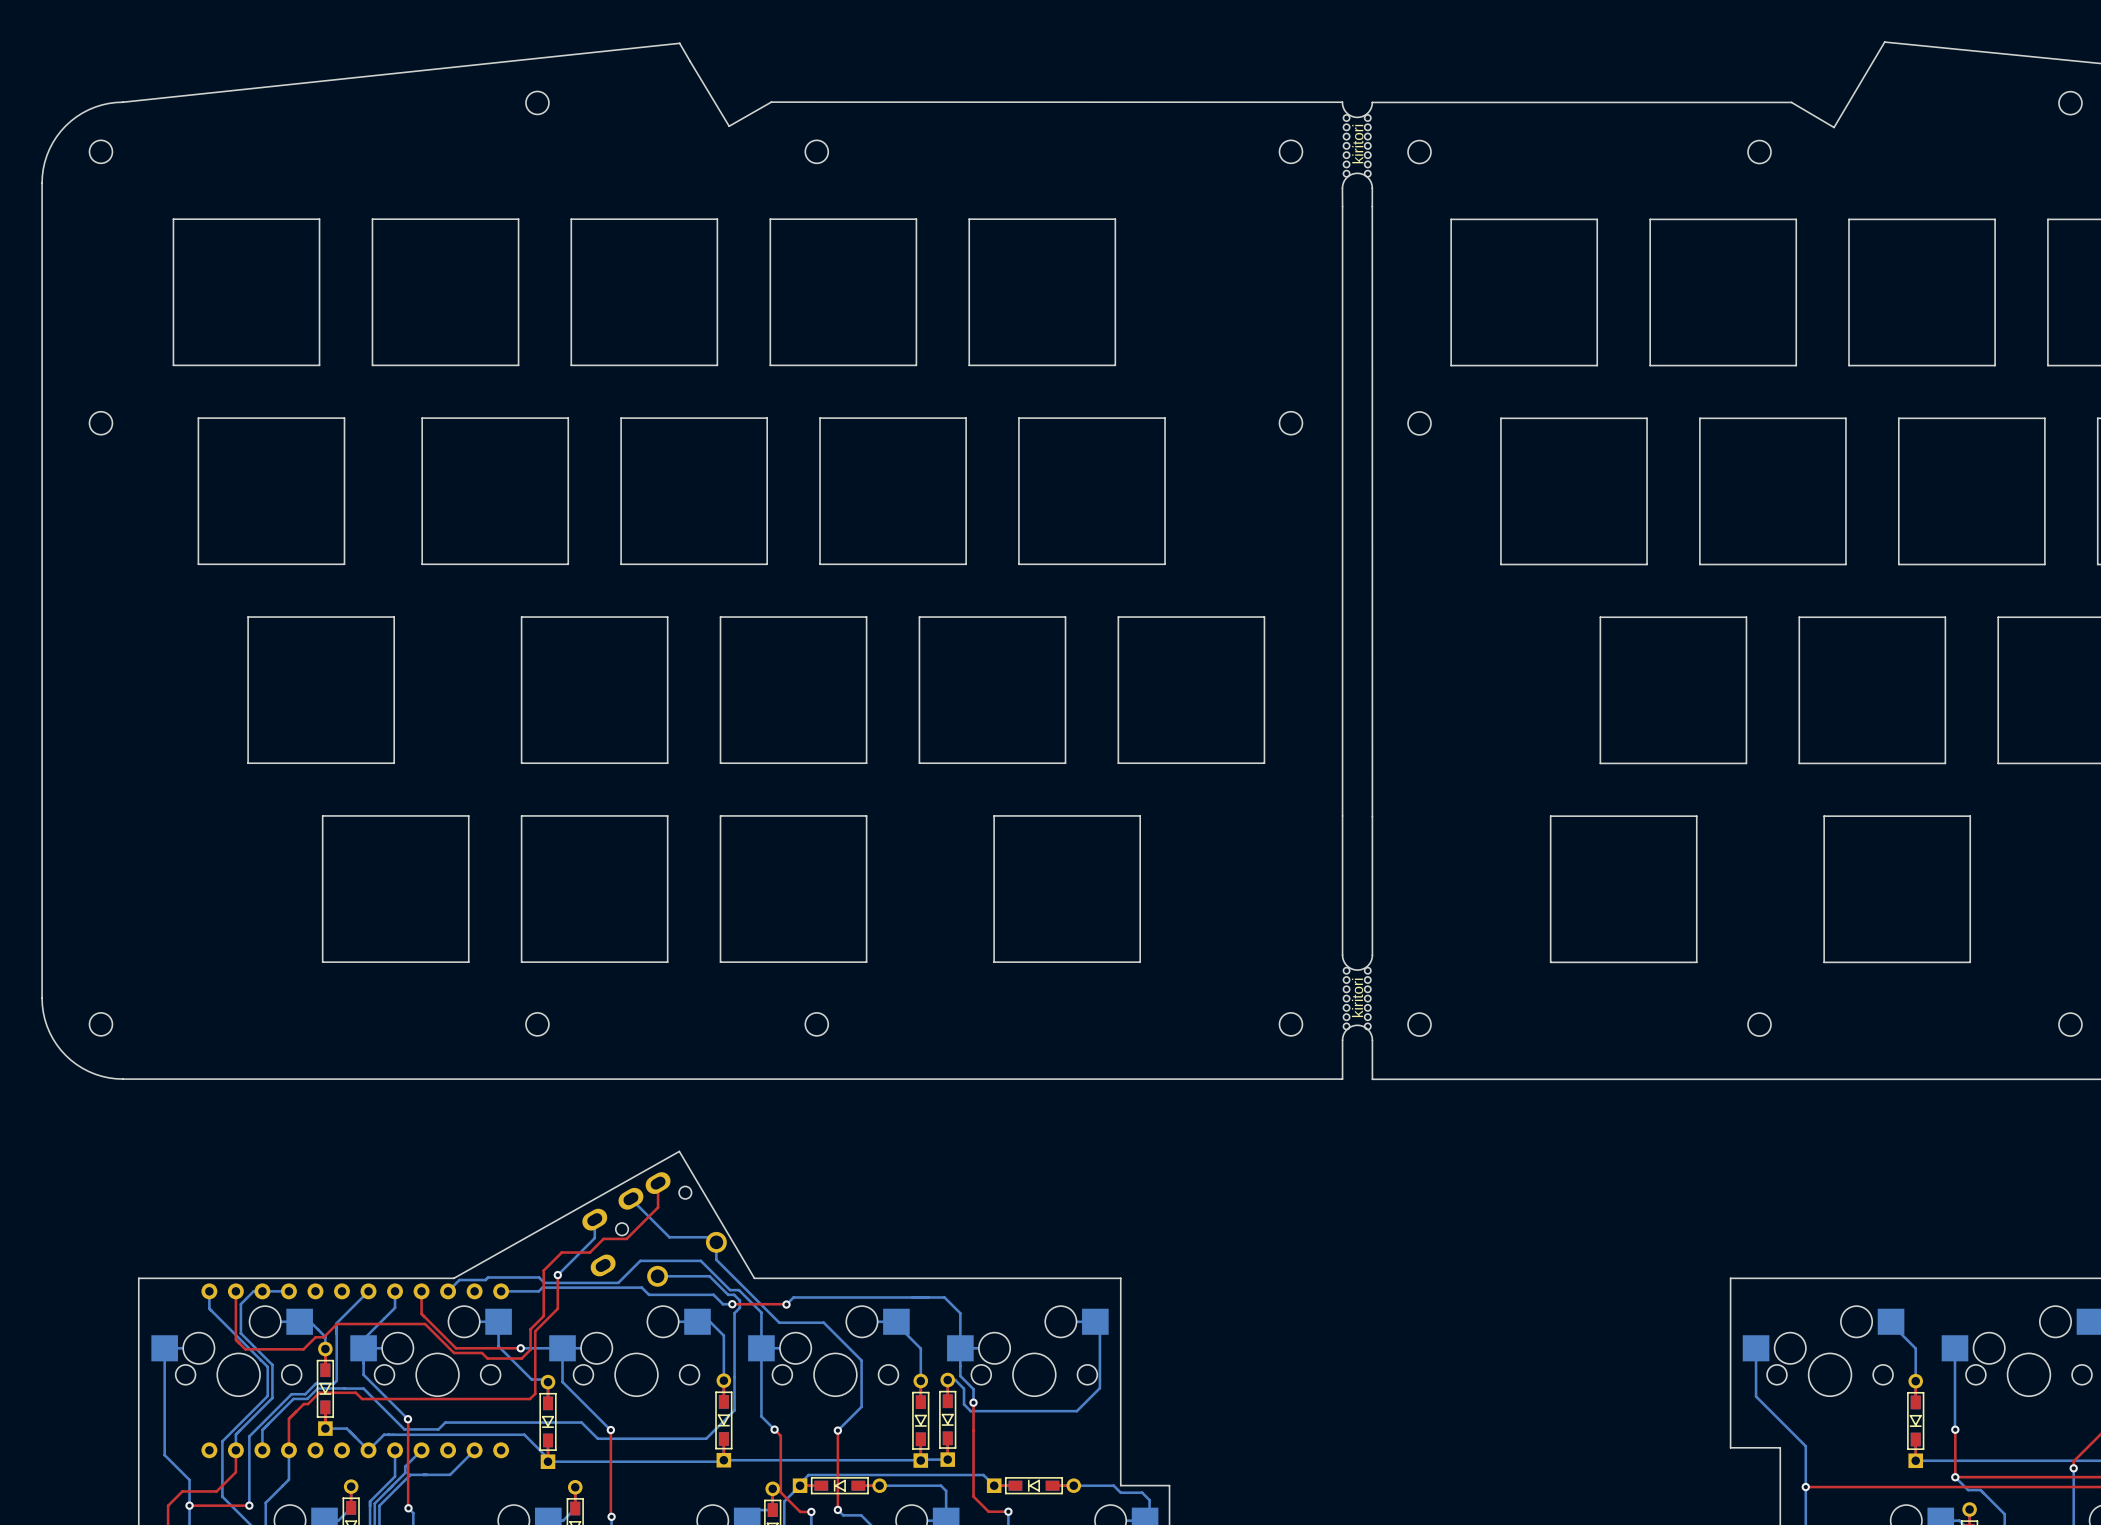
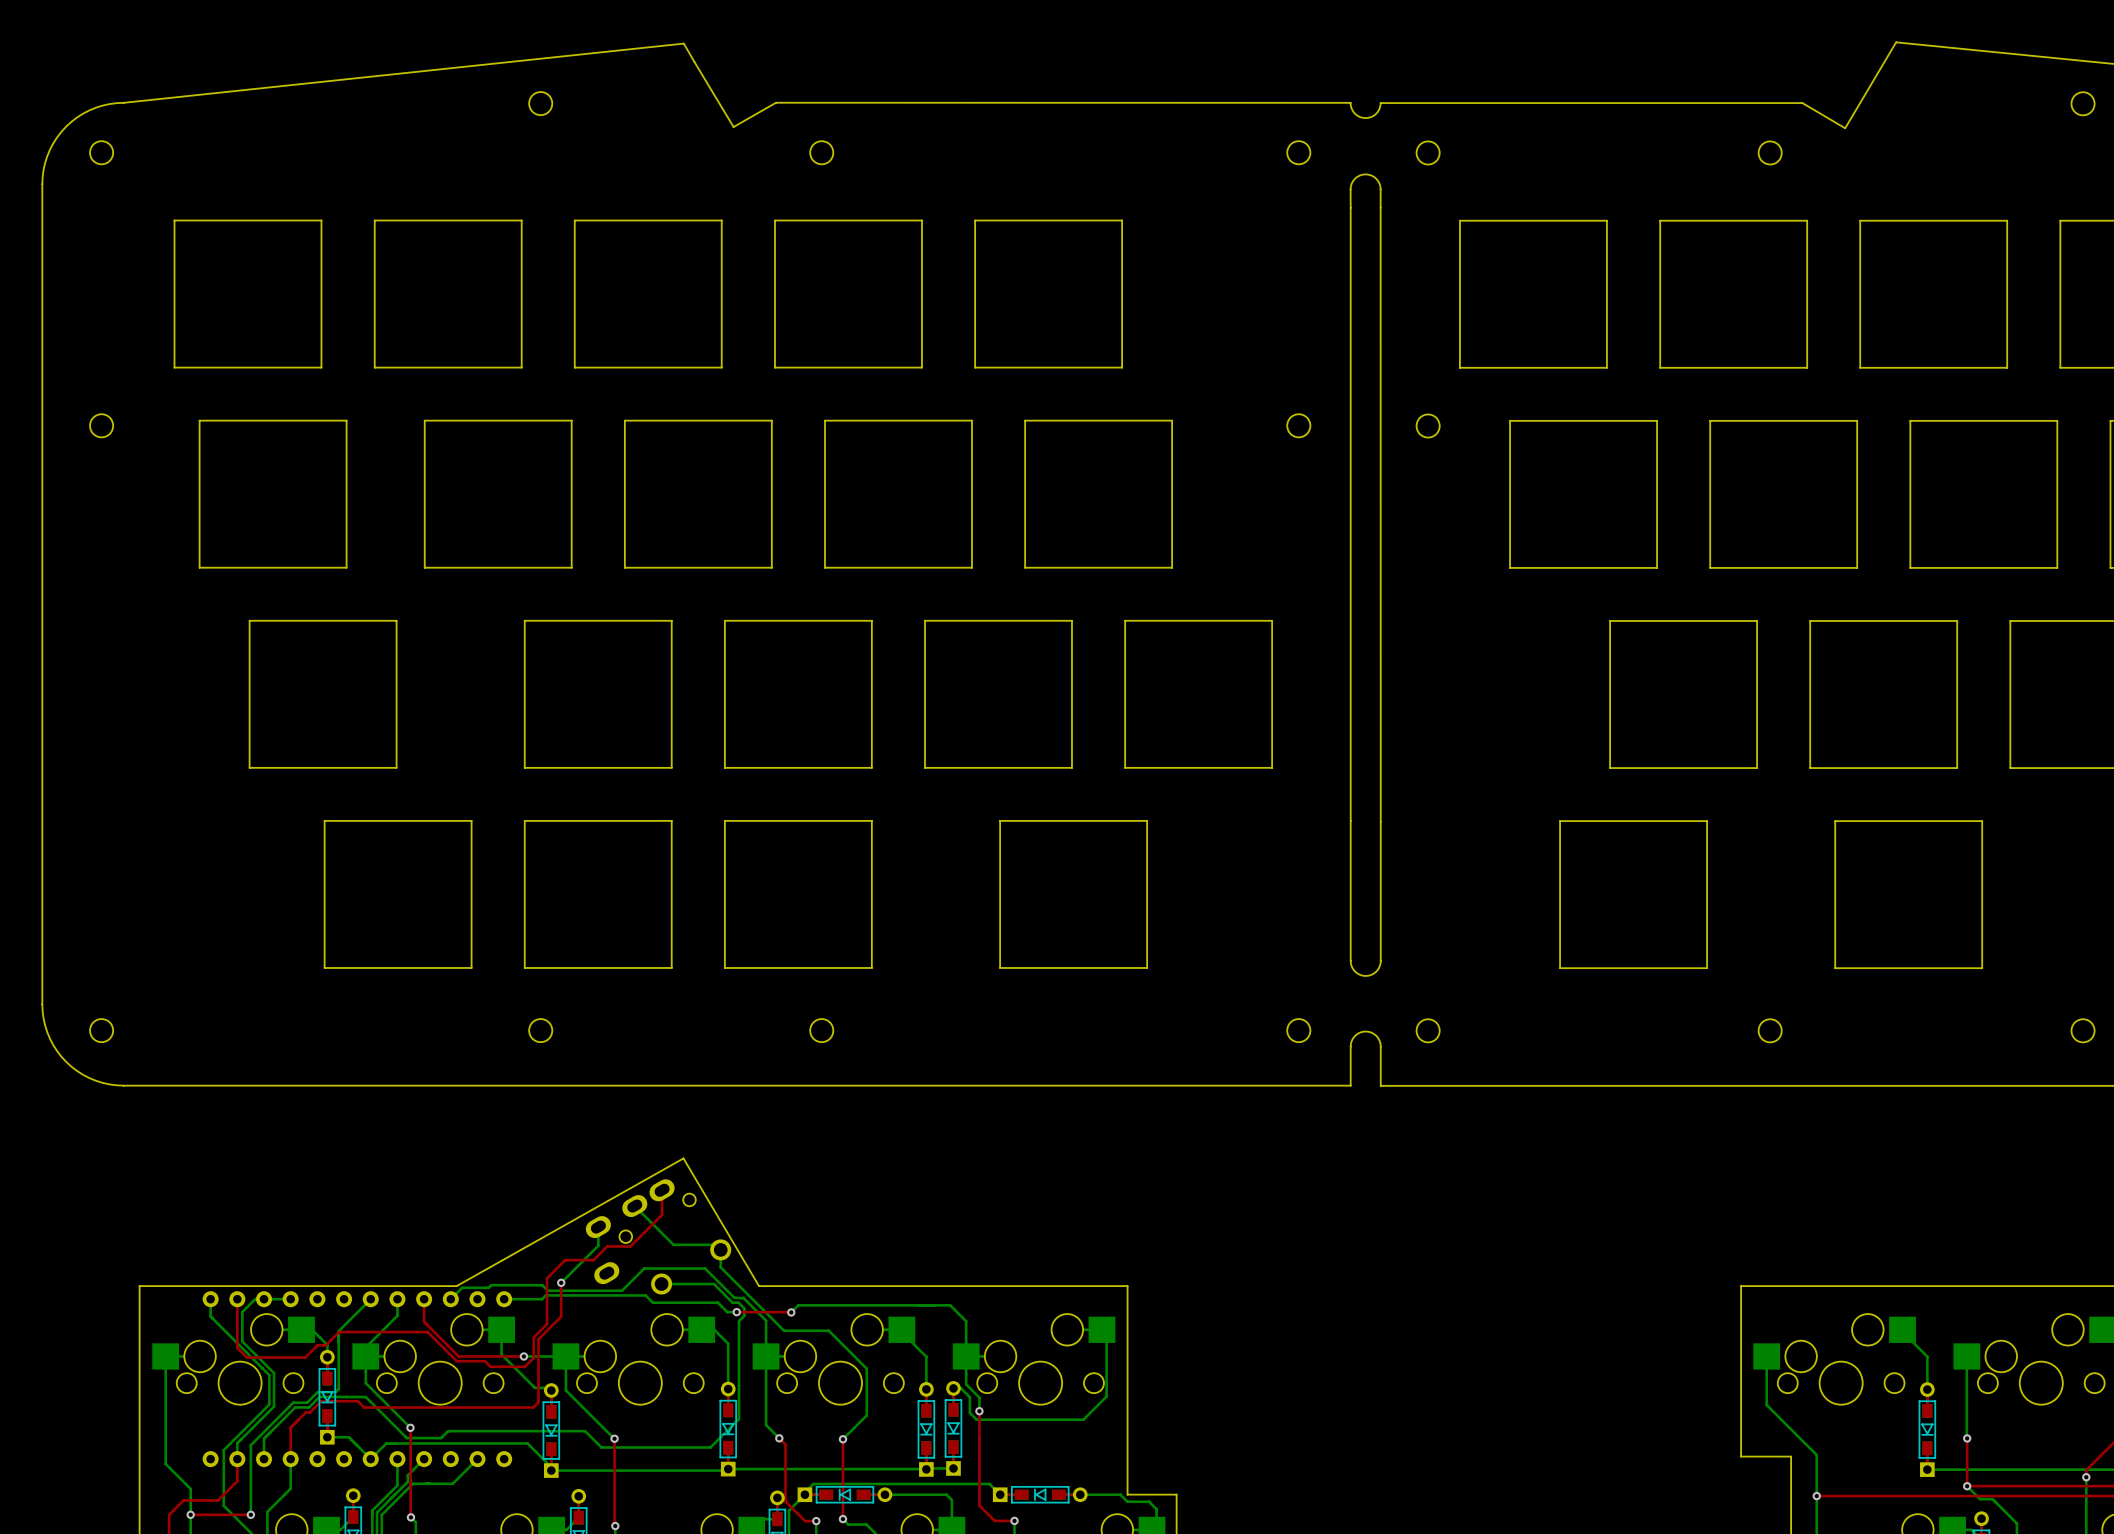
kiritori: (1357, 145) -> none
kiritori: (1357, 998) -> none

